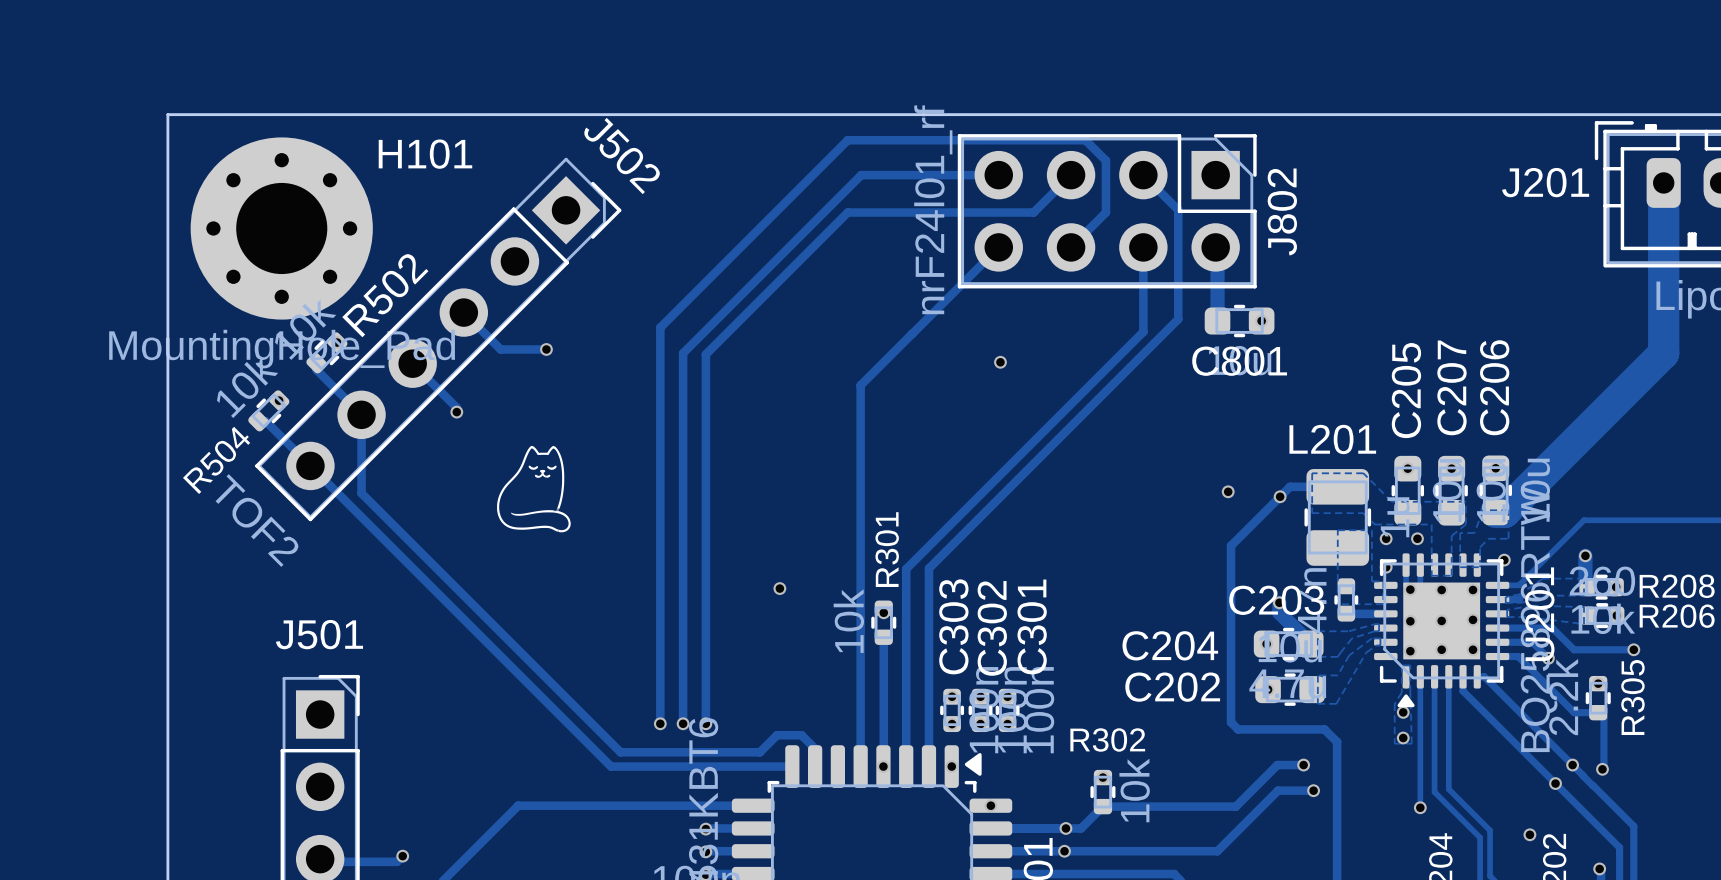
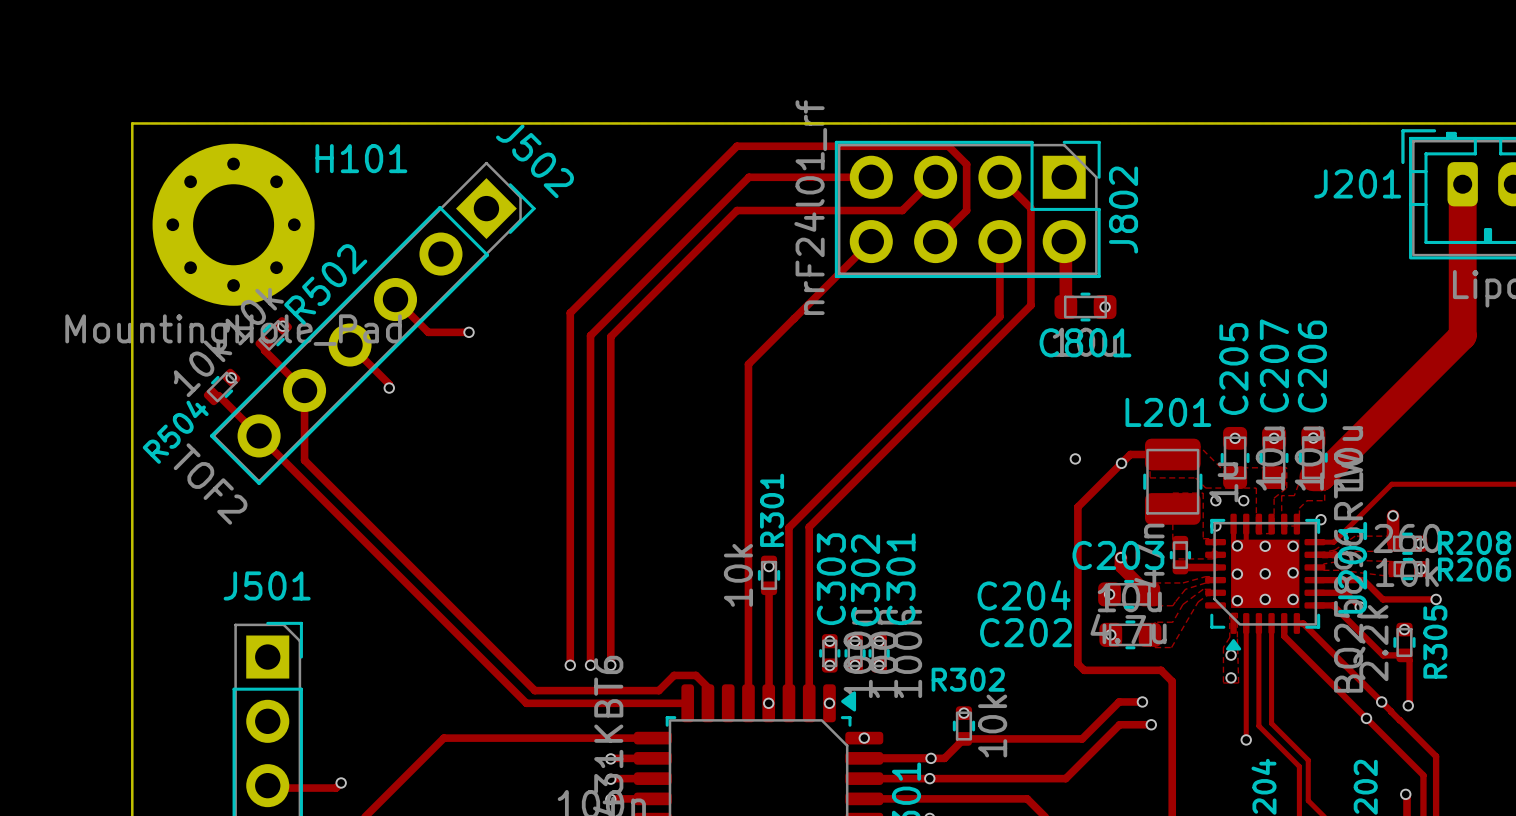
via: (1000, 362) -> none
drawing: [497, 445, 571, 533] -> none
via: (779, 588) -> none
via: (1529, 834) -> none

